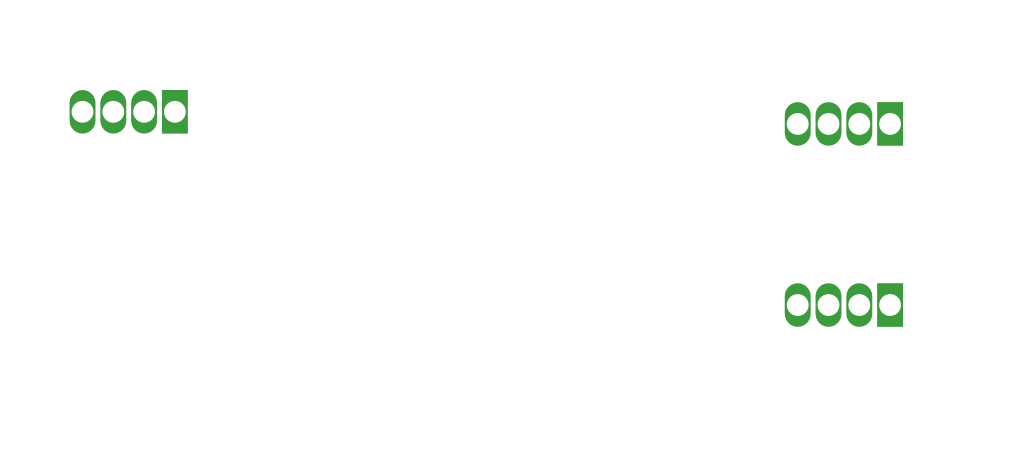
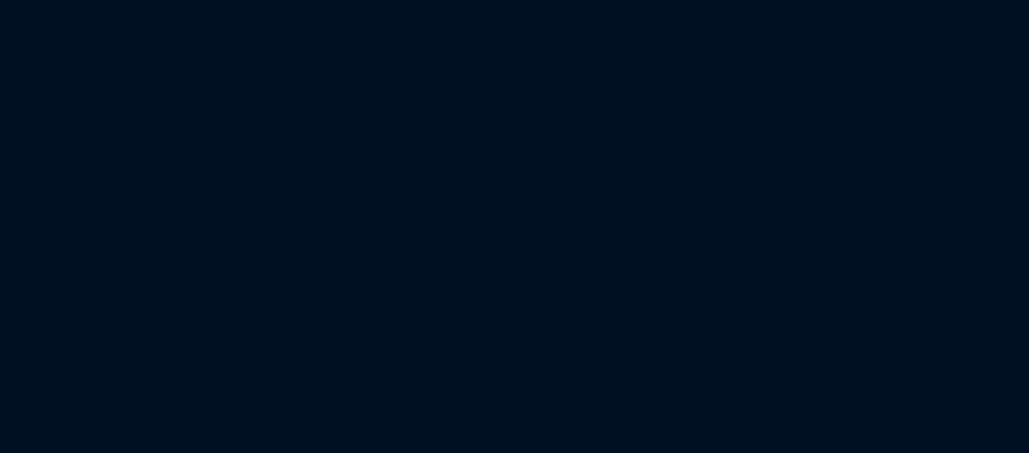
part: (128, 111) -> none
part: (843, 123) -> none
part: (843, 305) -> none

